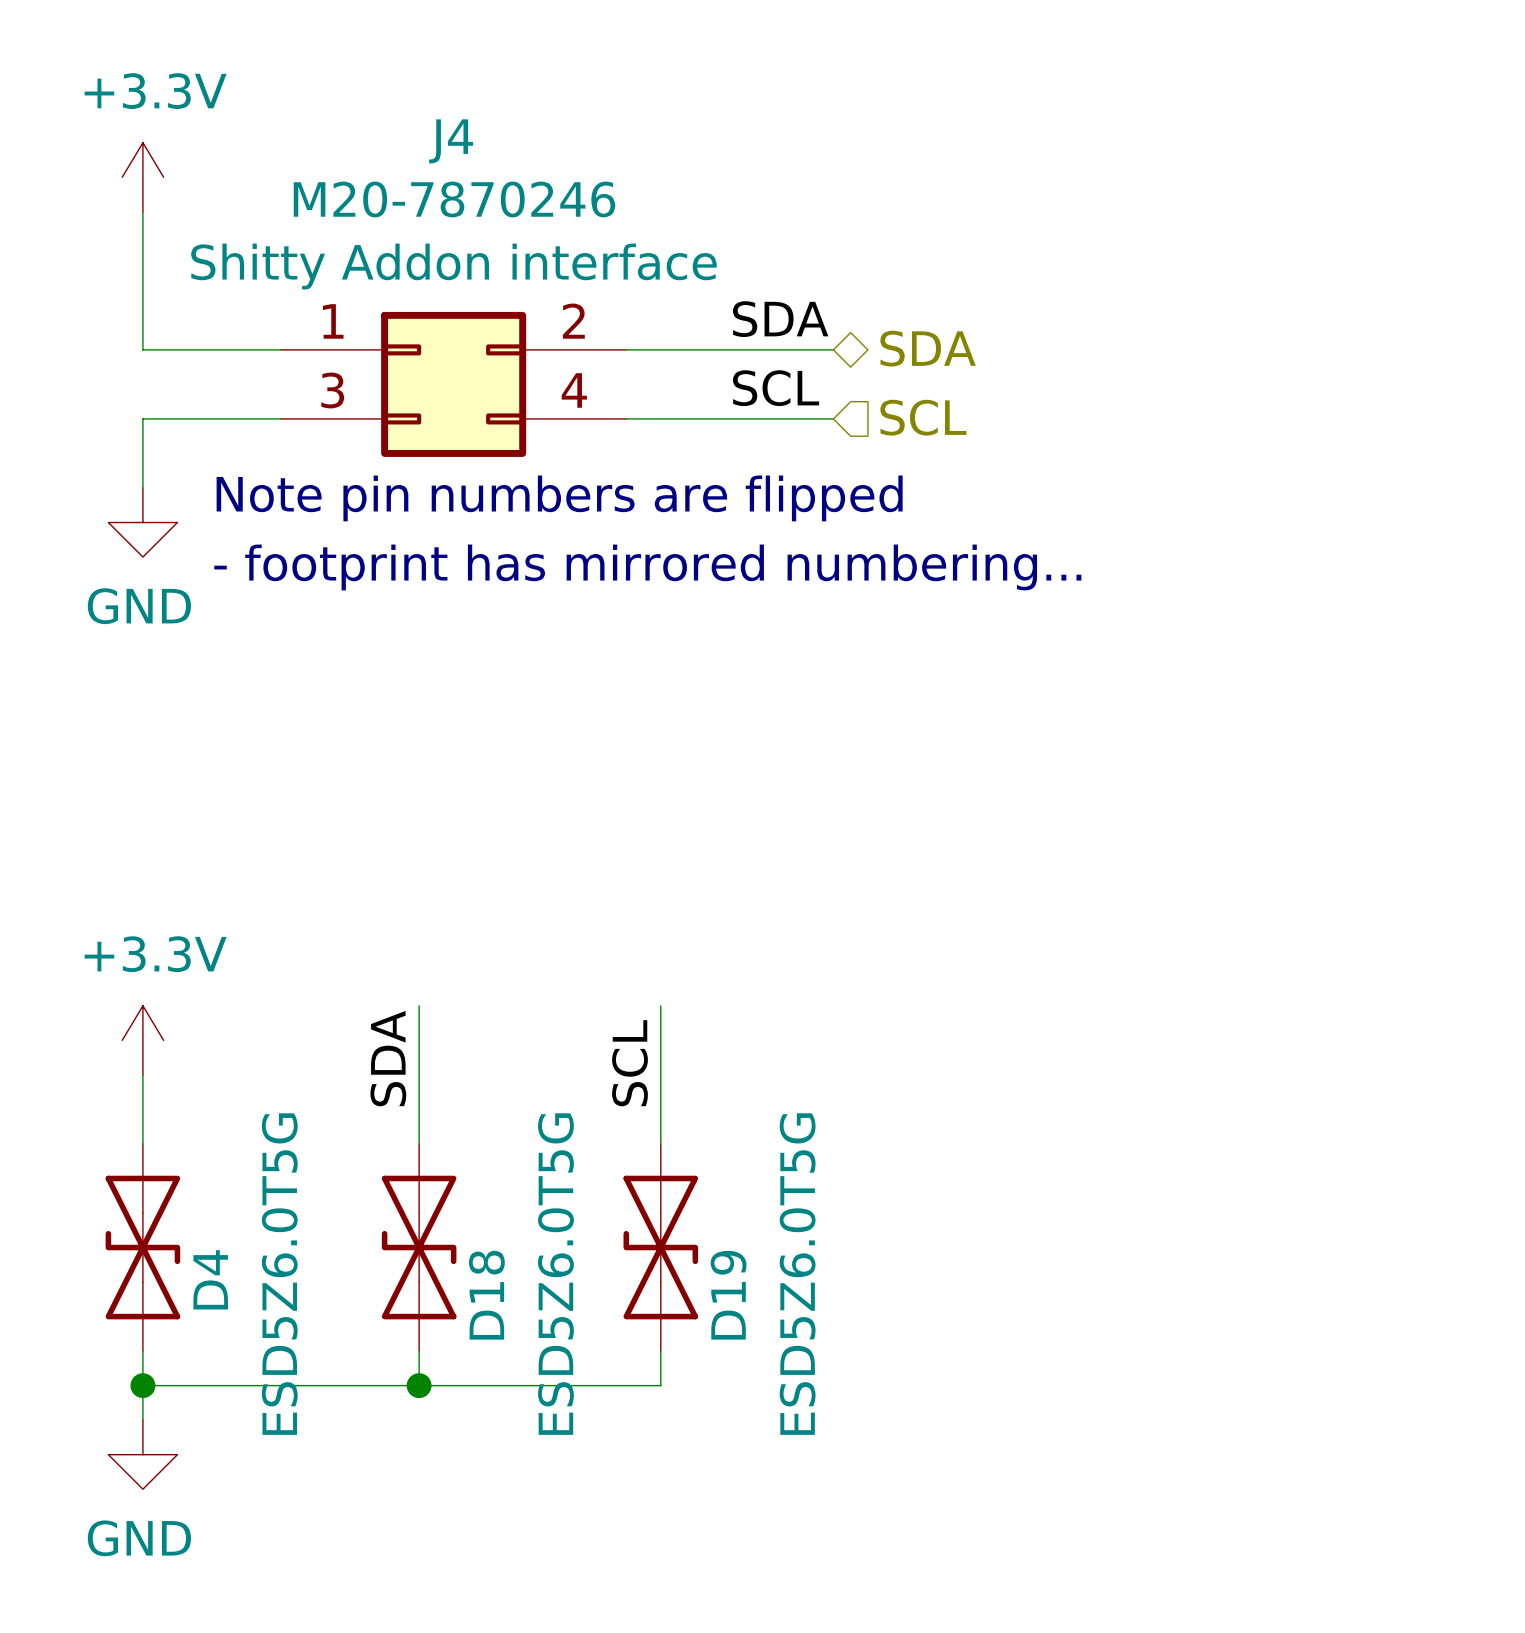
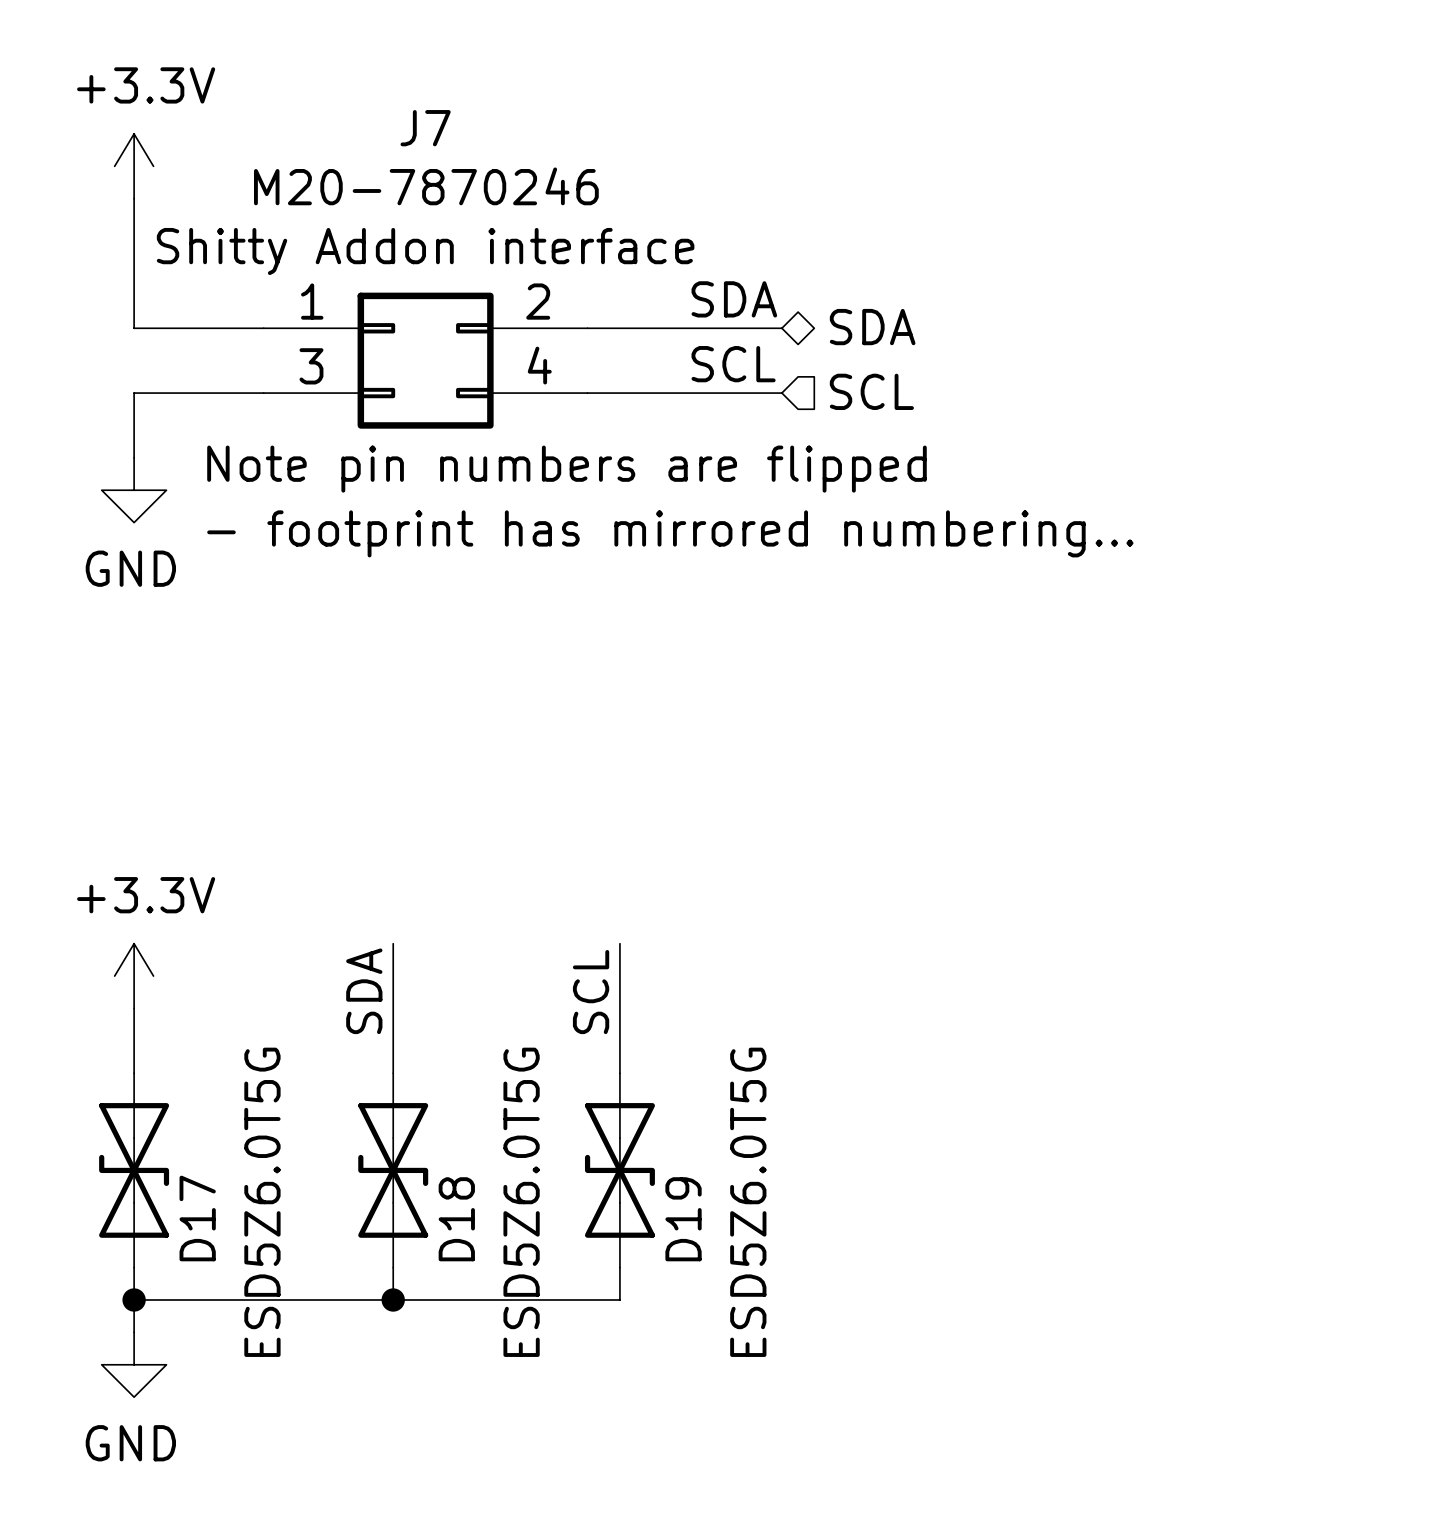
J4 name: J4 (451, 141) -> J7 (425, 128)
D4 name: D4 (210, 1279) -> D17 (197, 1218)

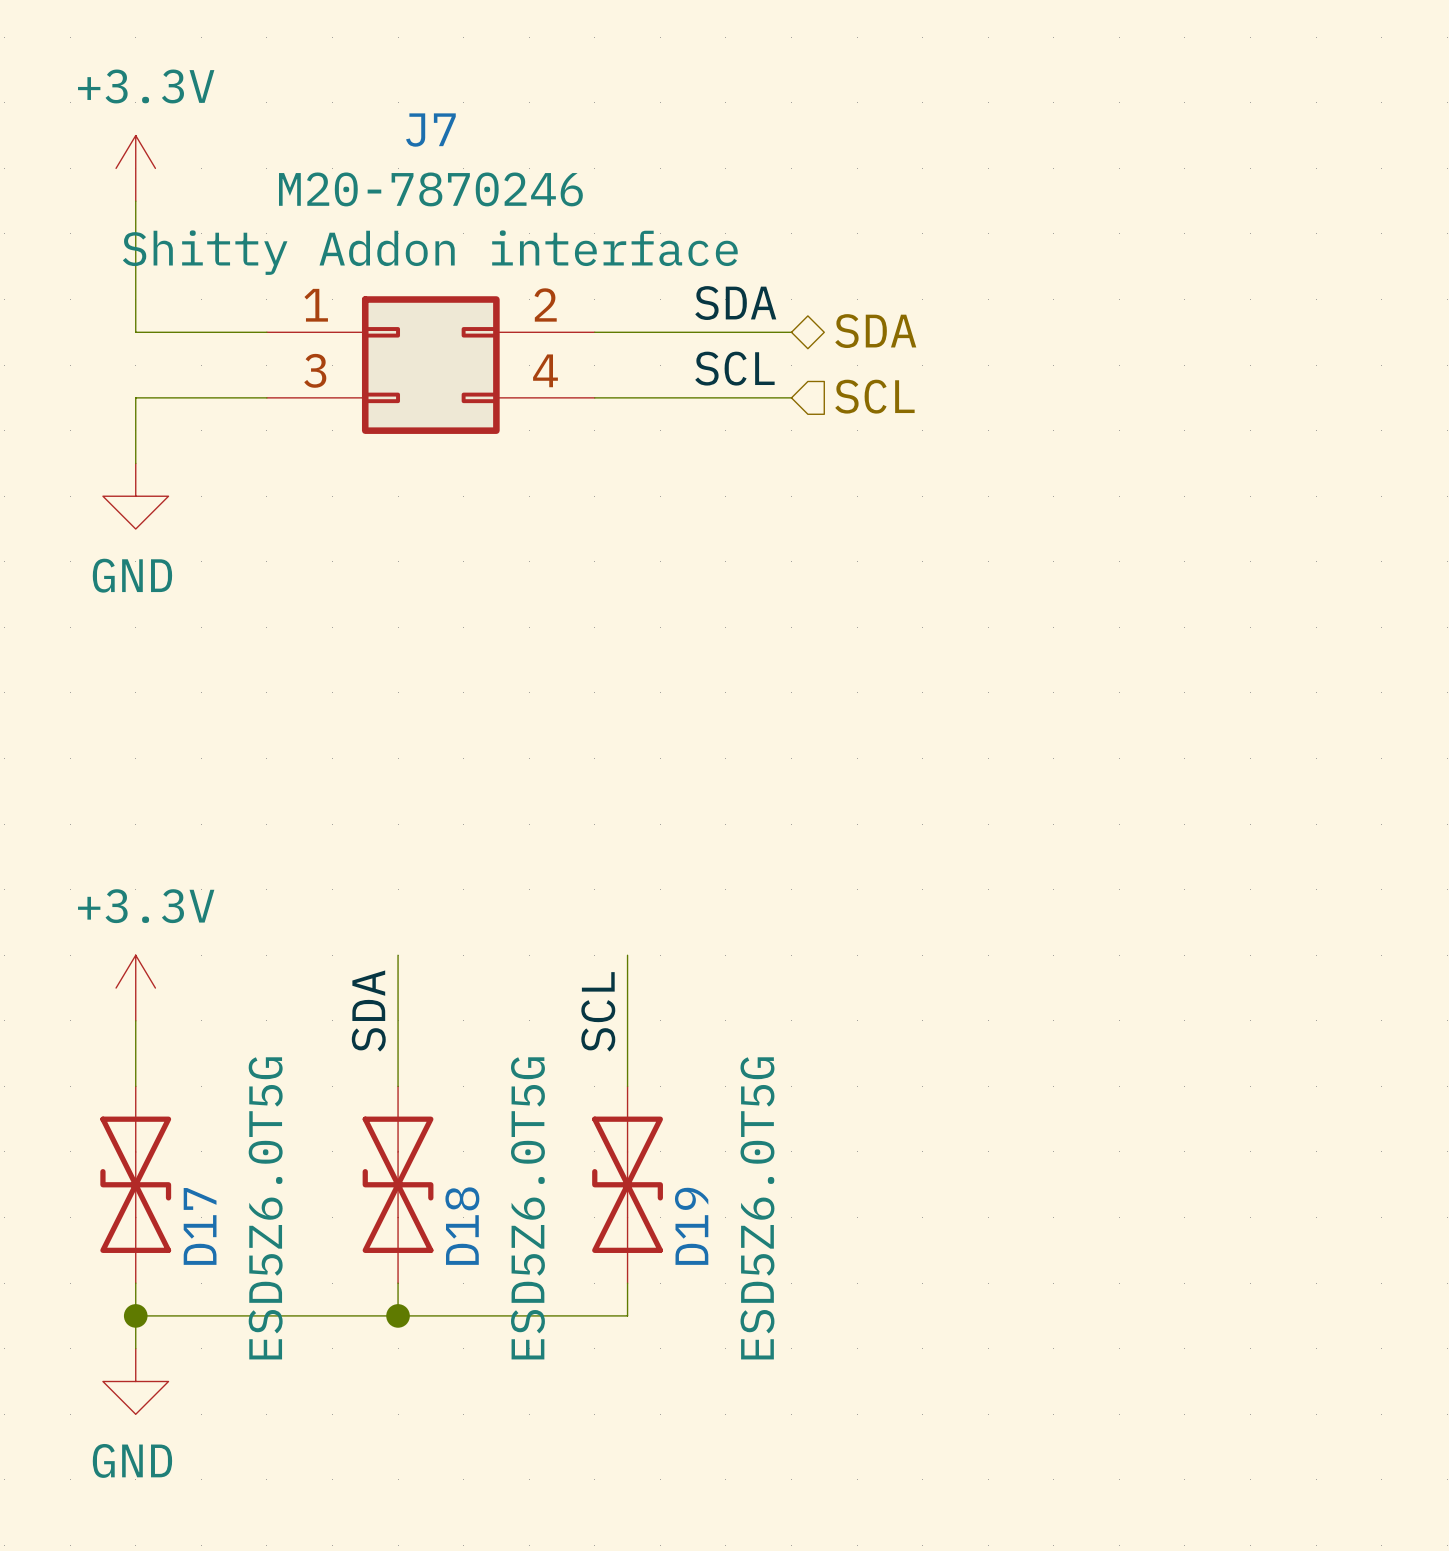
text: Note pin numbers are flipped (566, 469) -> none
text: - footprint has mirrored numbering... (670, 533) -> none

